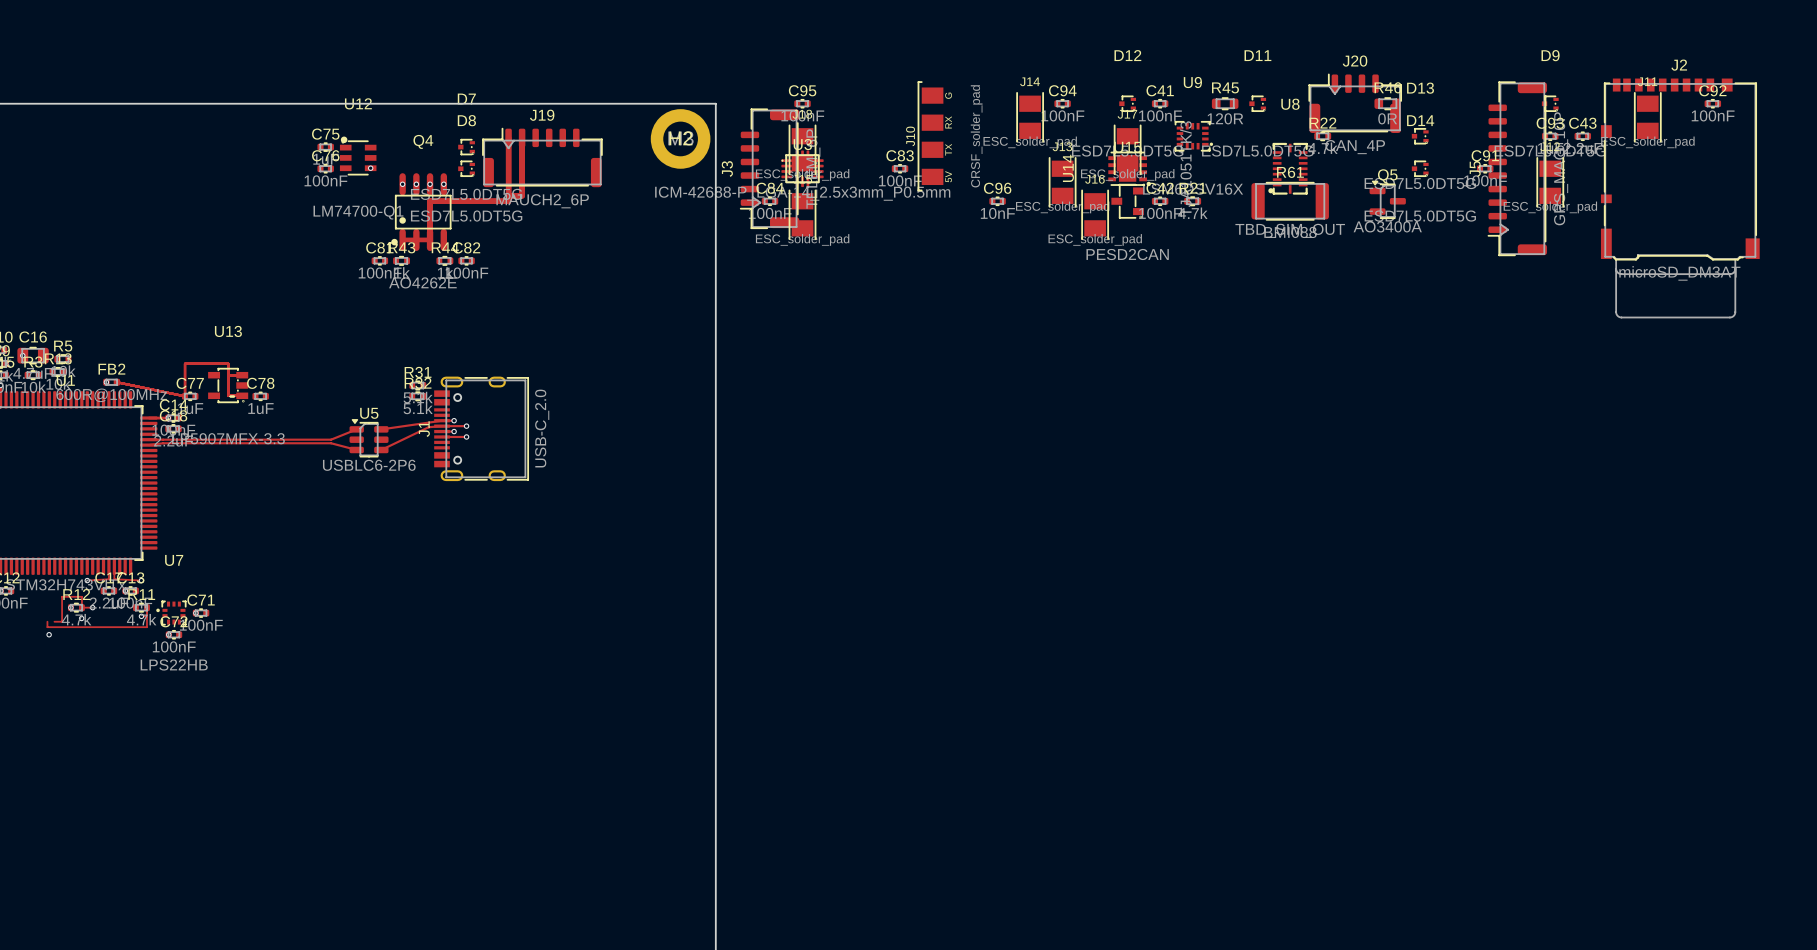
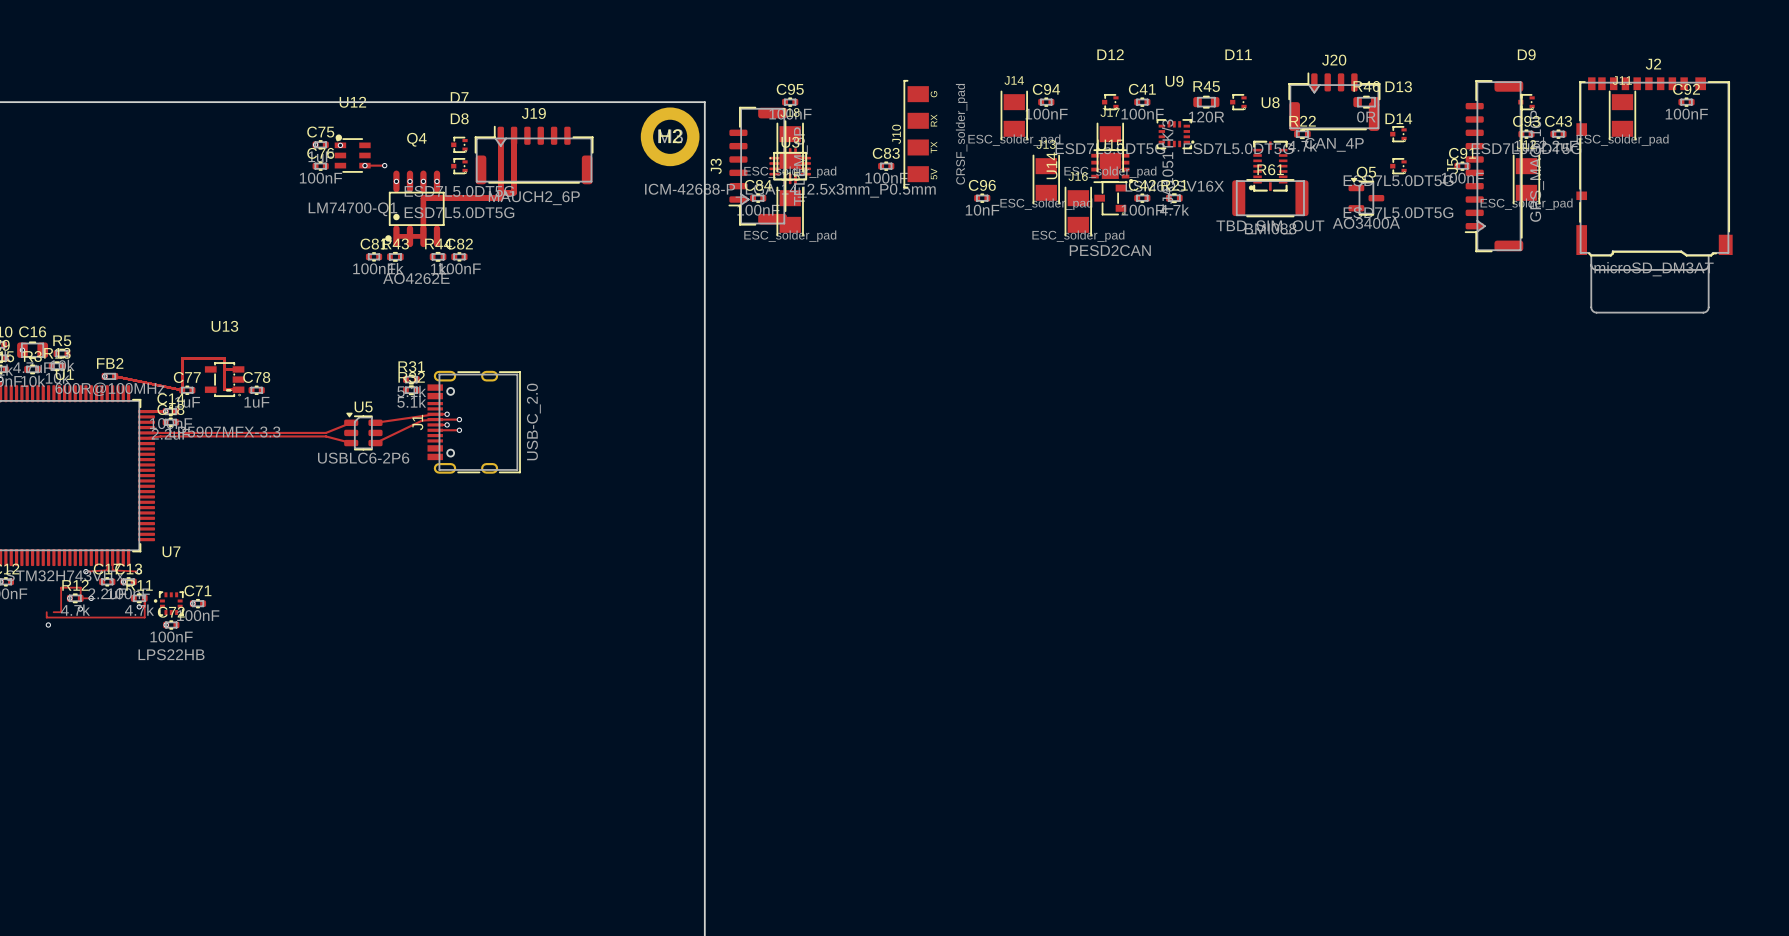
via: none -> (315, 144)
via: none -> (340, 145)
track: none -> (364, 165) (384, 165)
via: none -> (384, 165)

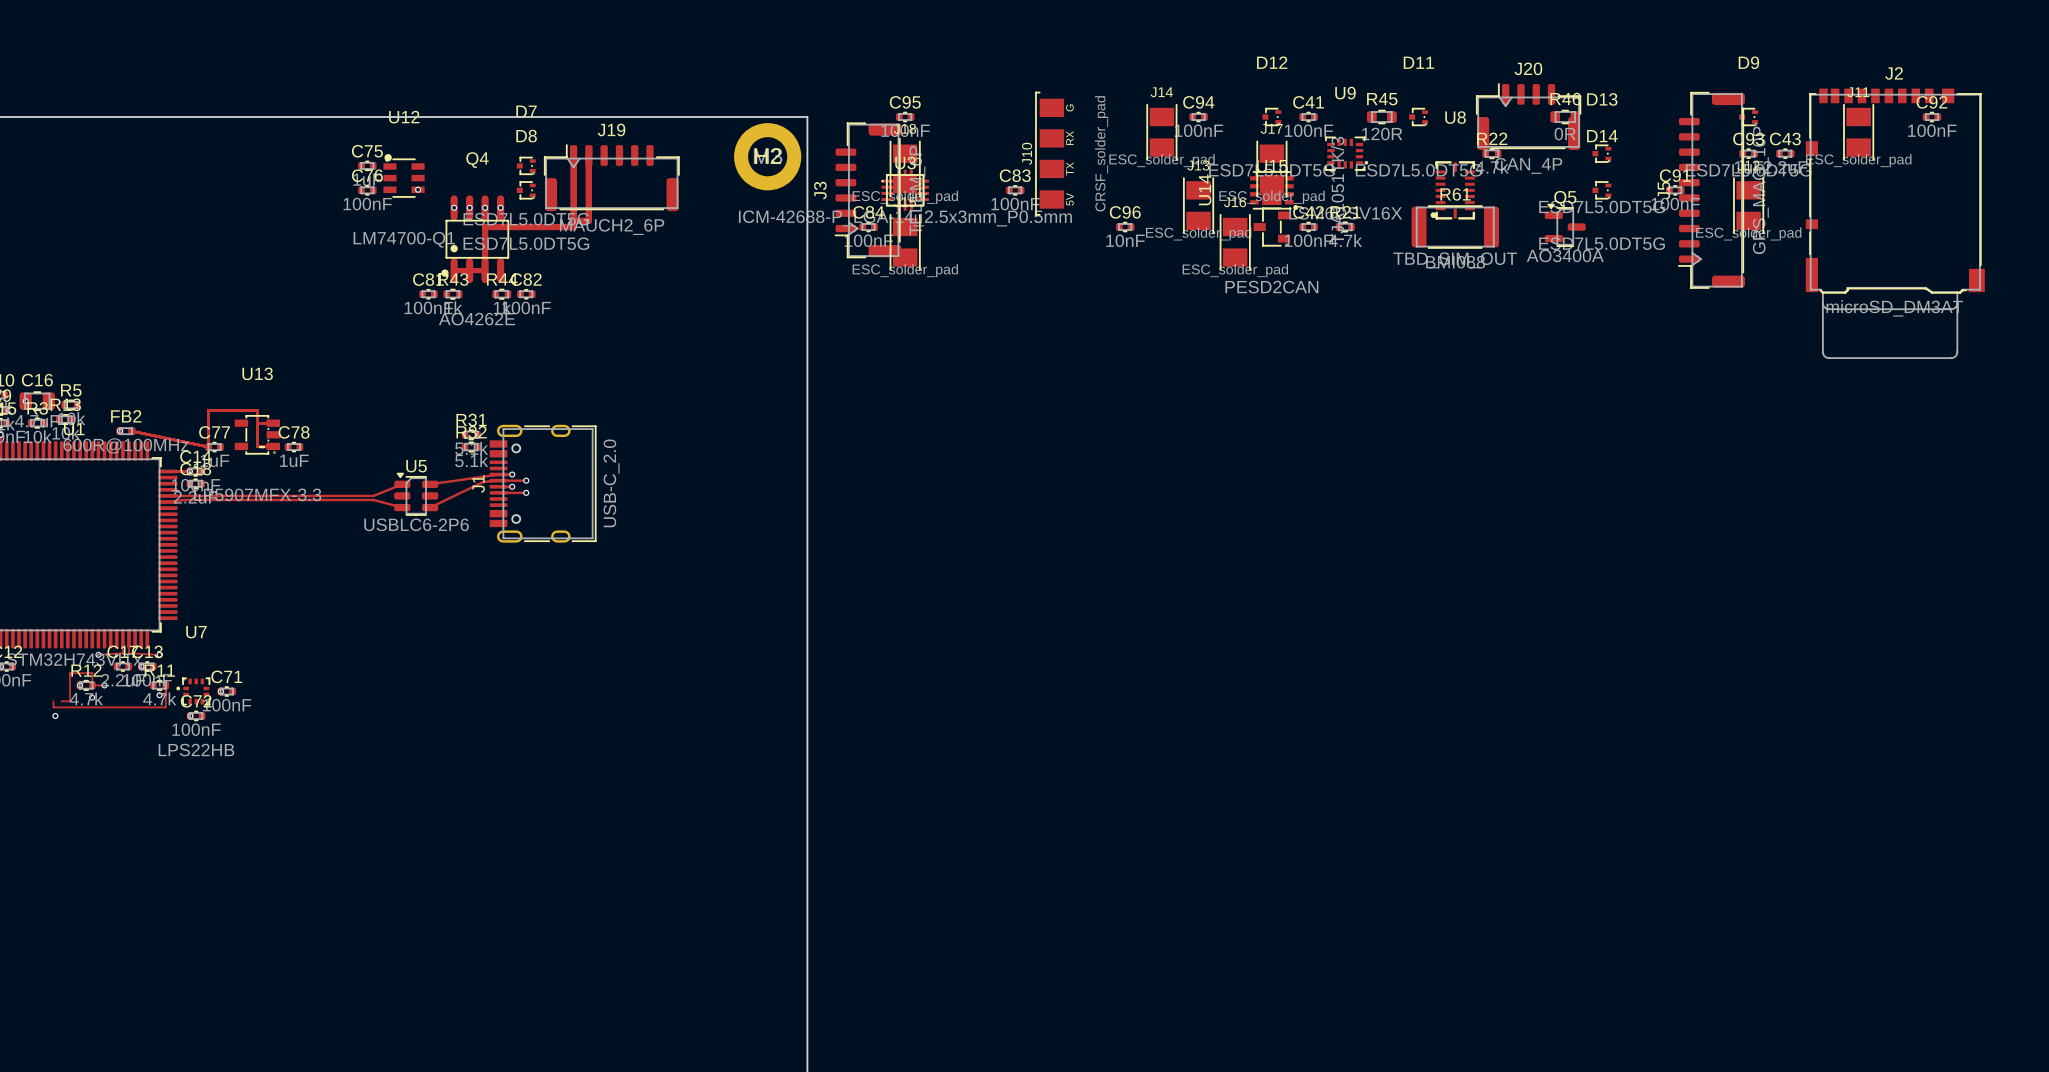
via: (315, 144) -> none
via: (340, 145) -> none
track: (364, 165) (384, 165) -> none
via: (384, 165) -> none

